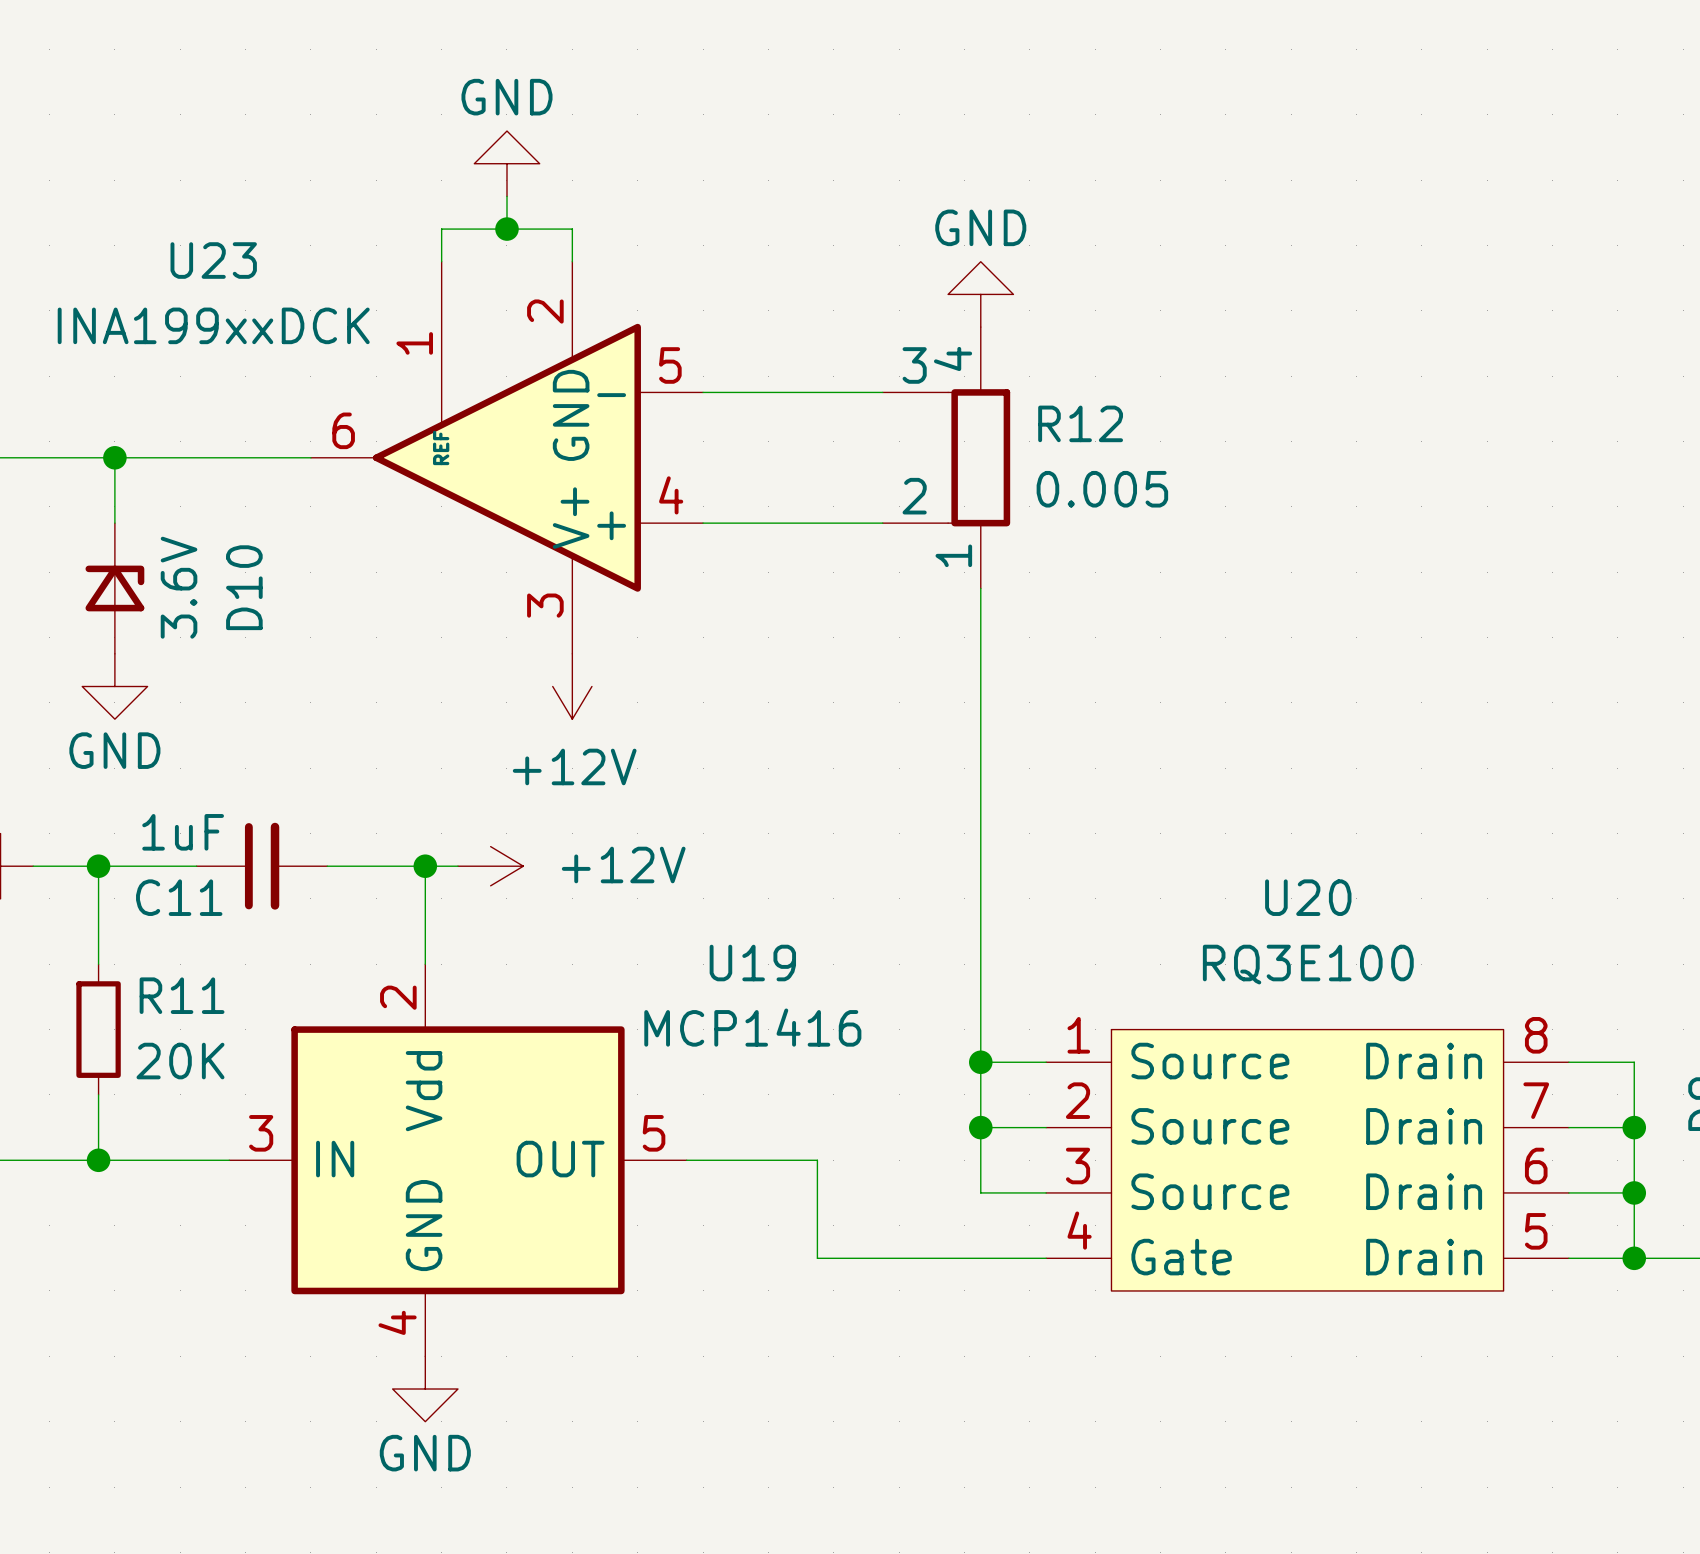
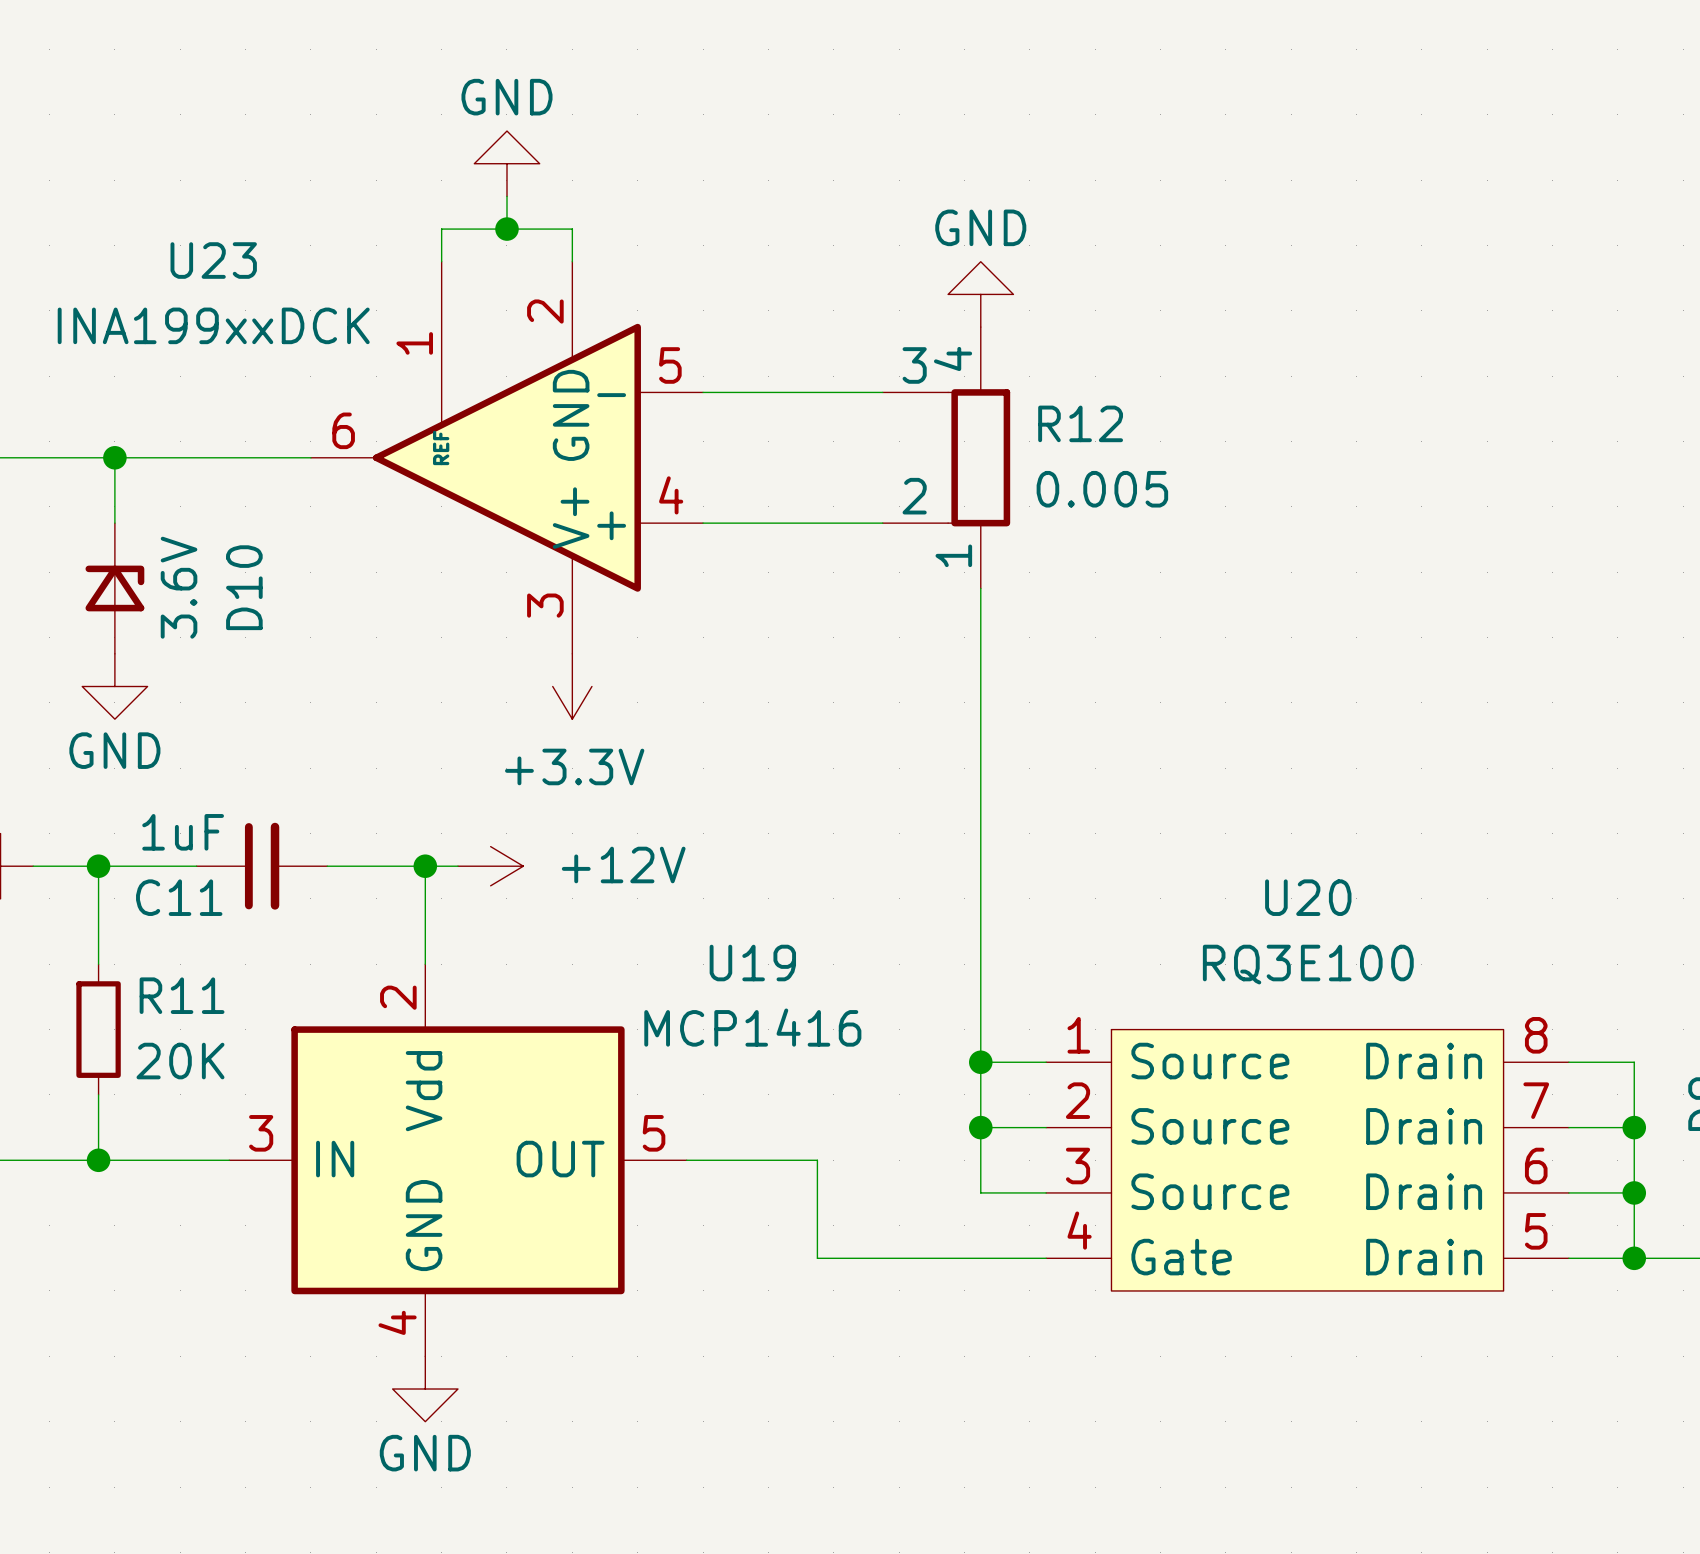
power symbol: +12V (572, 686) -> +3.3V (572, 686)

